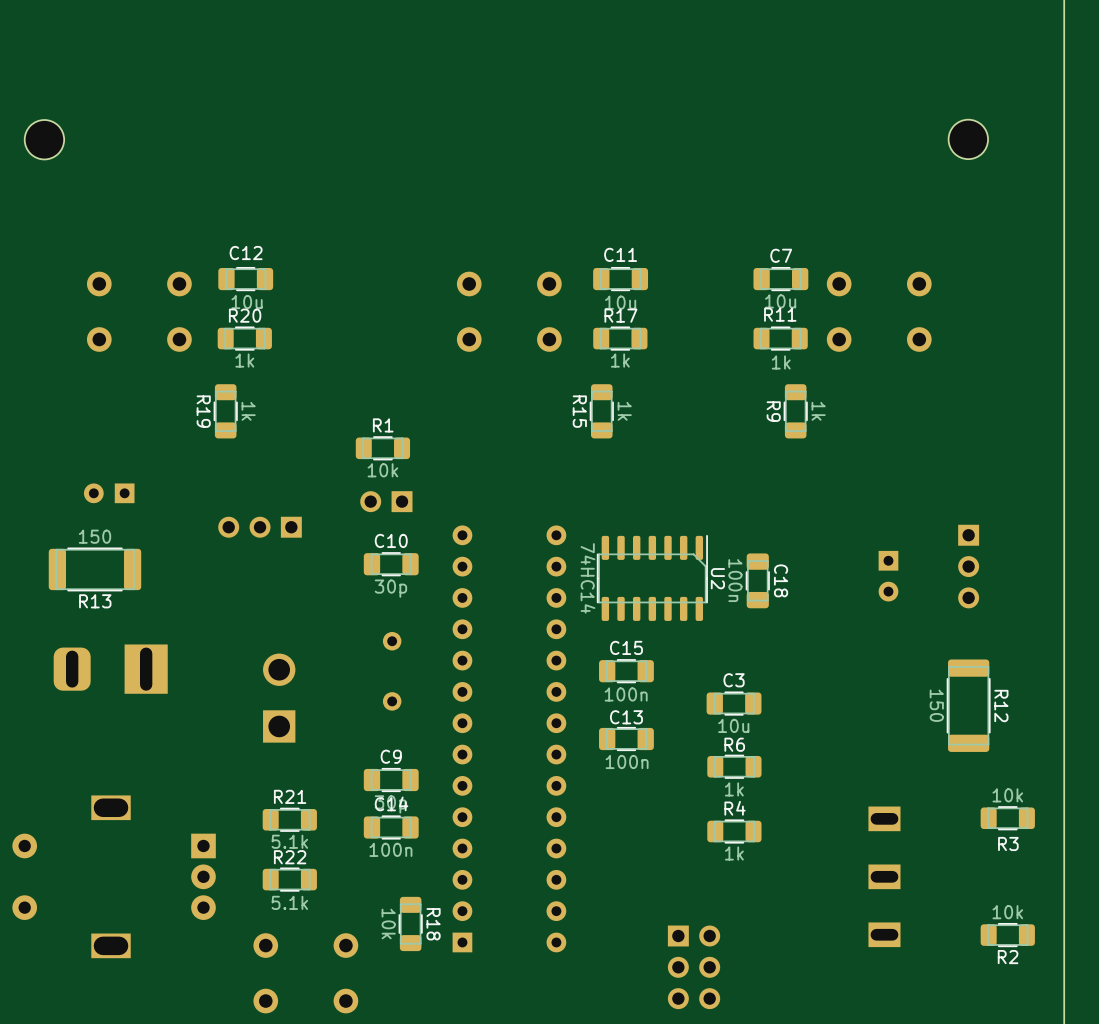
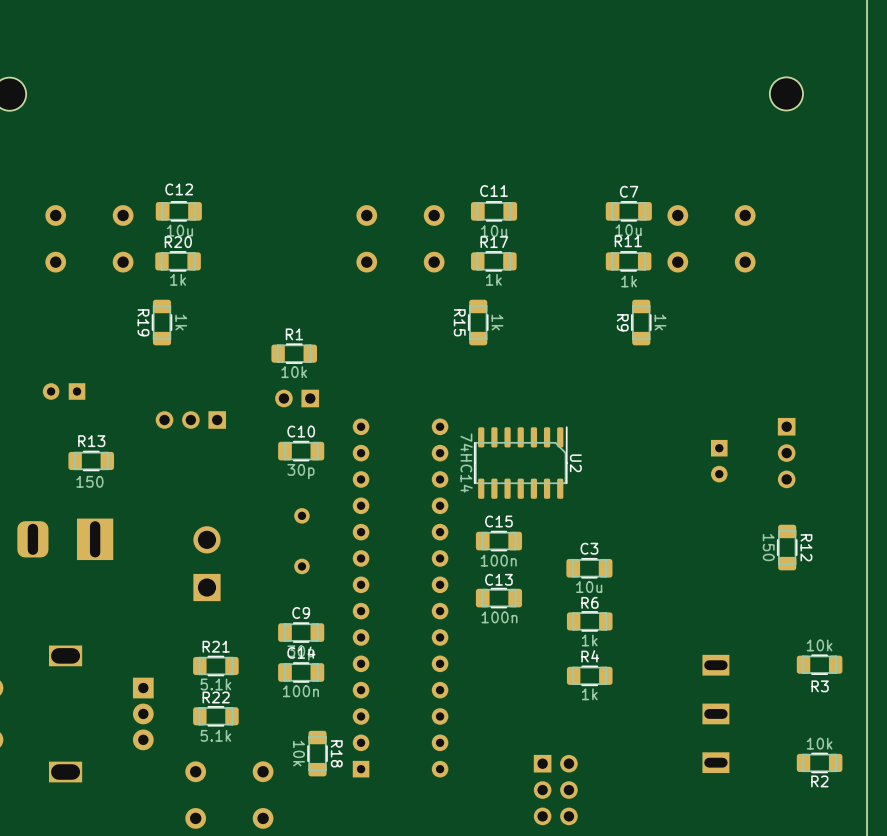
R13 value position: 150 (94, 536) -> 150 (89, 481)
R13 footprint: [48, 547, 142, 592] -> [68, 450, 115, 472]
C18: 100n (757, 580) -> none
R13 name position: R13 (95, 601) -> R13 (91, 441)
R12 footprint: [946, 659, 991, 752] -> [777, 524, 798, 571]

